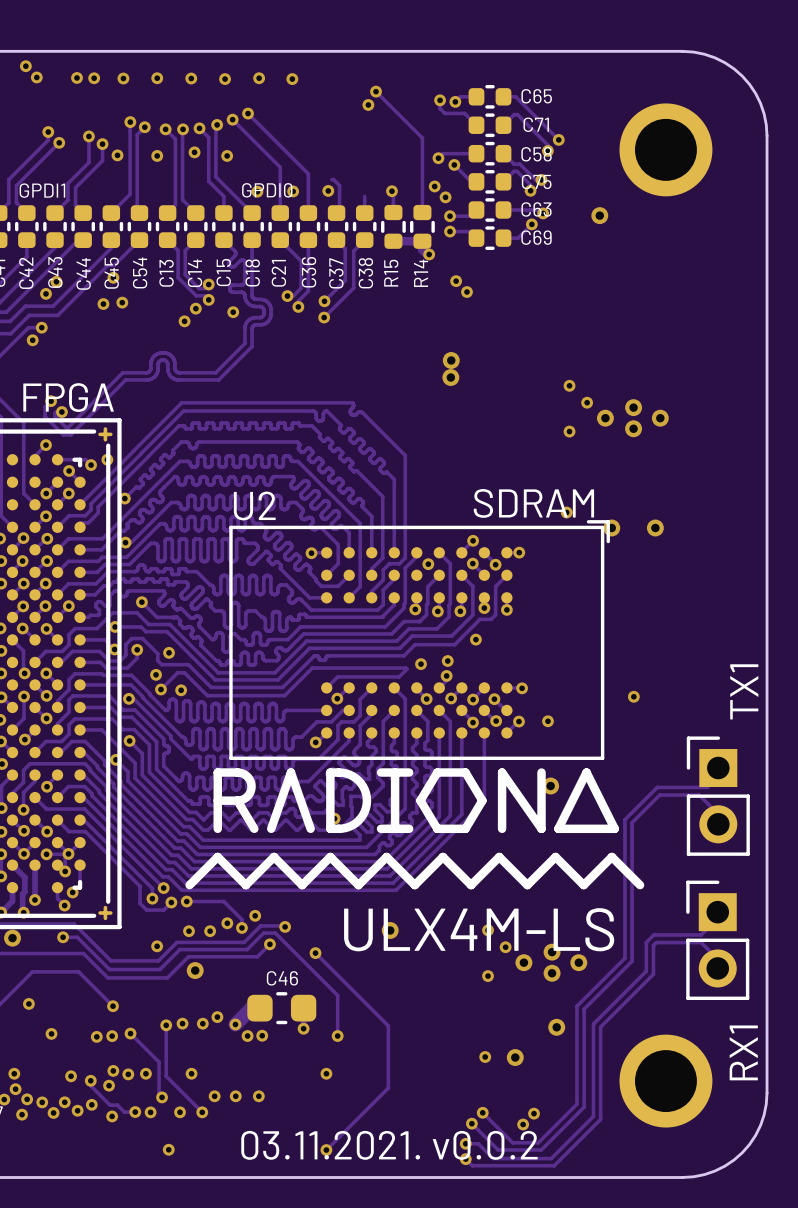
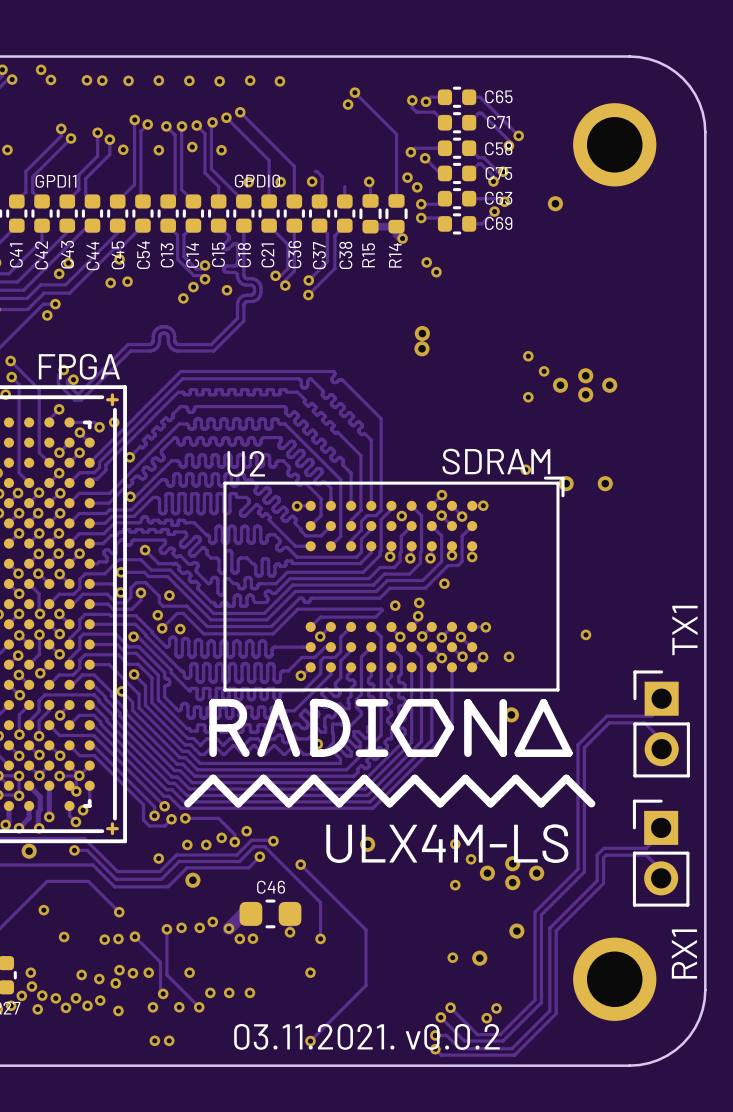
track: (90, 1080) (90, 1085) (110, 1105) (117, 1105) (124, 1112) (135, 1112) -> none
via position: (135, 1112) -> (154, 1040)

